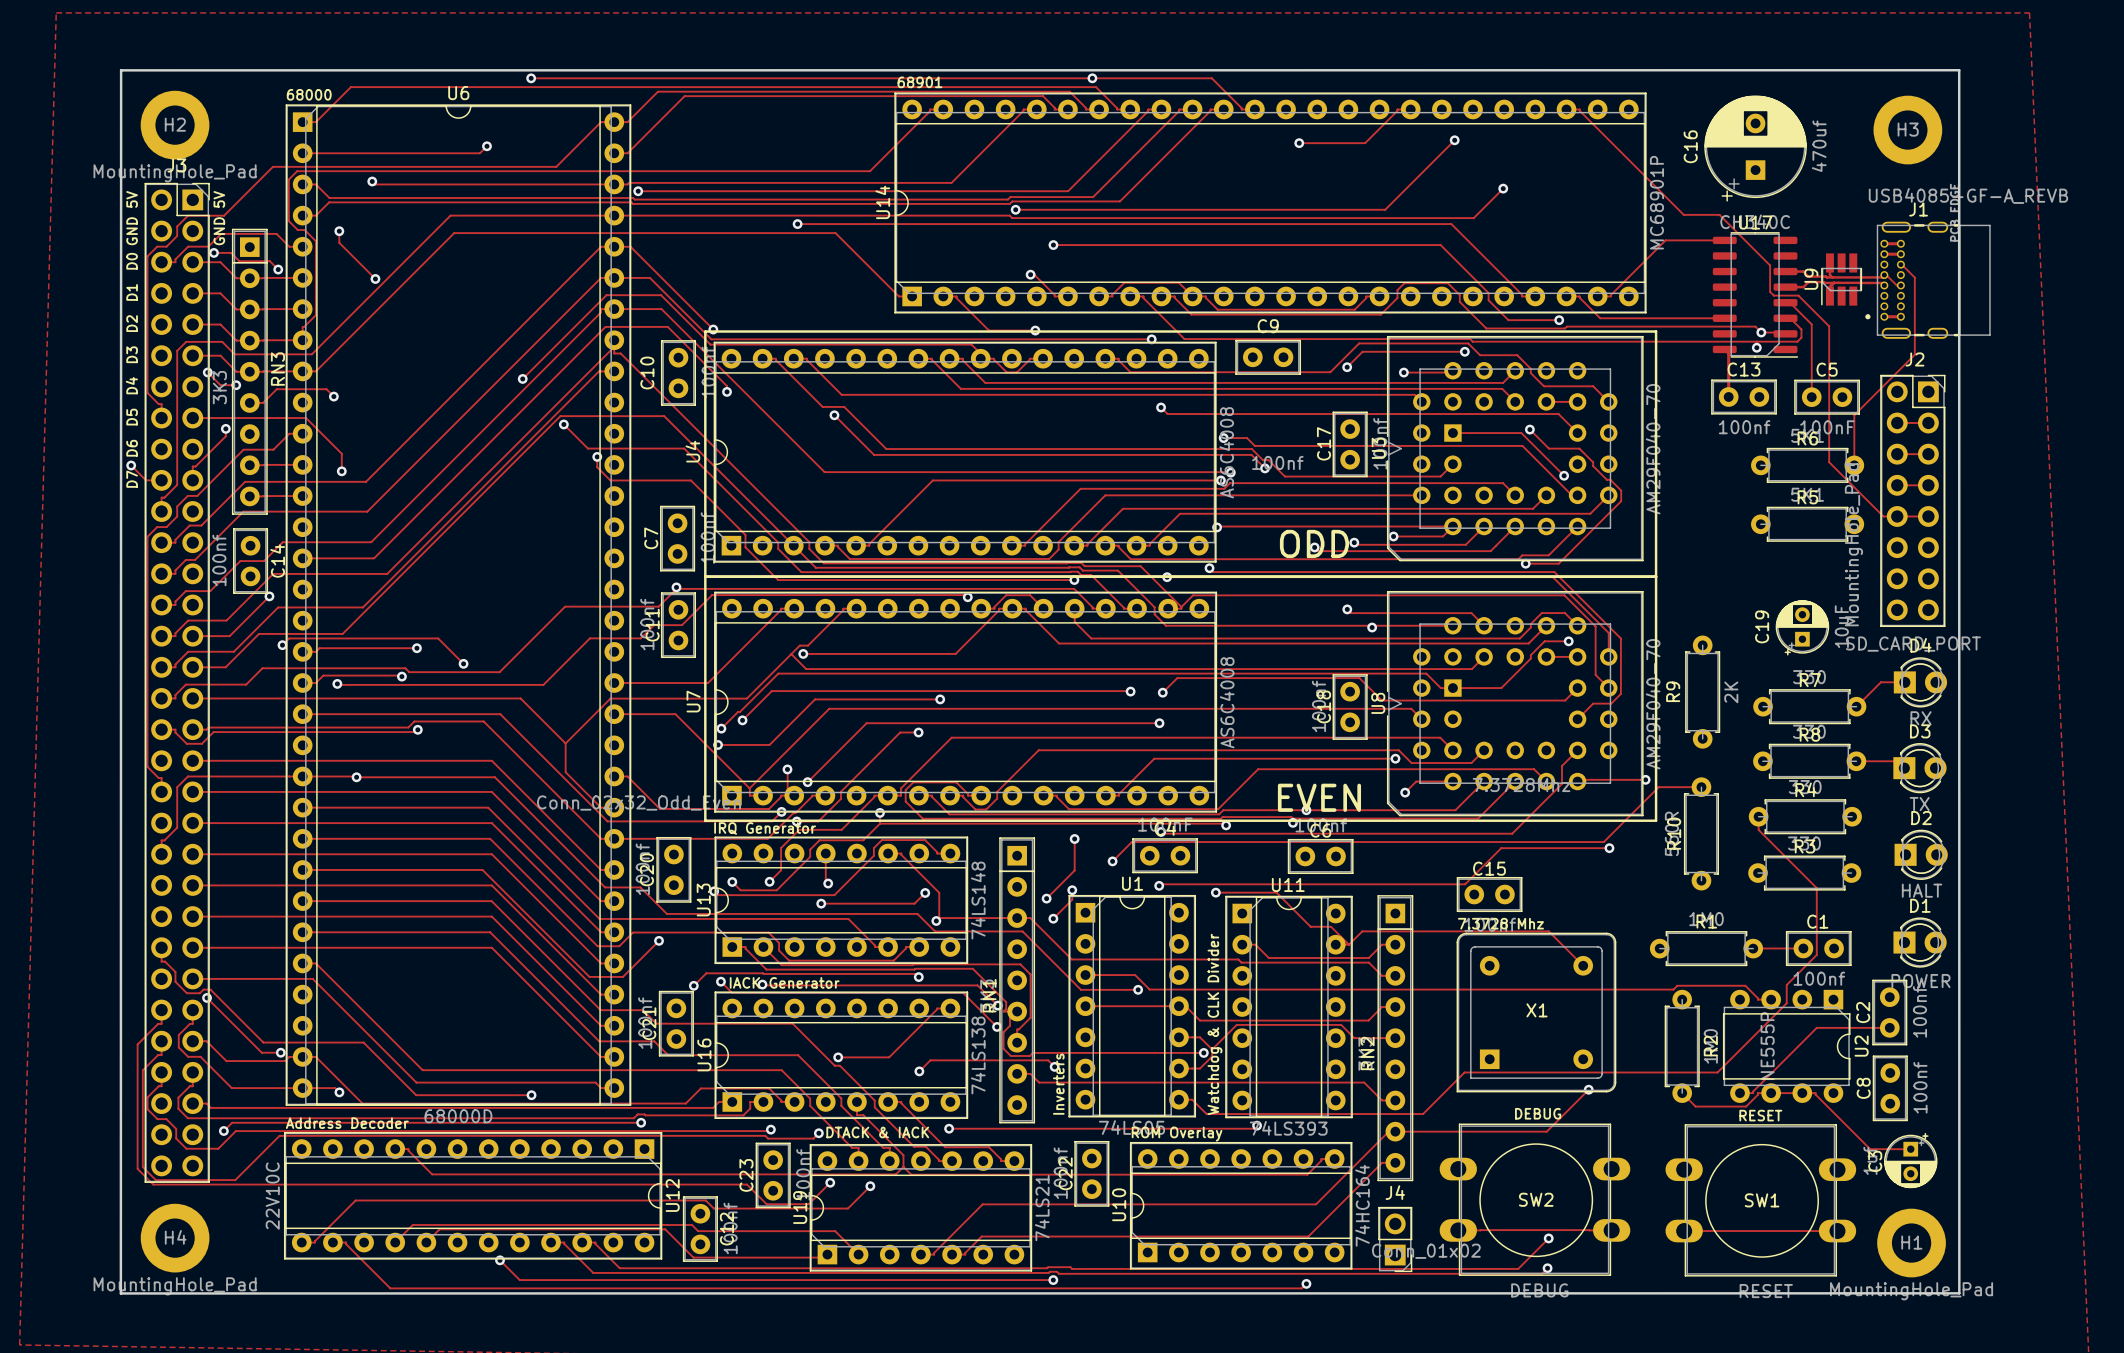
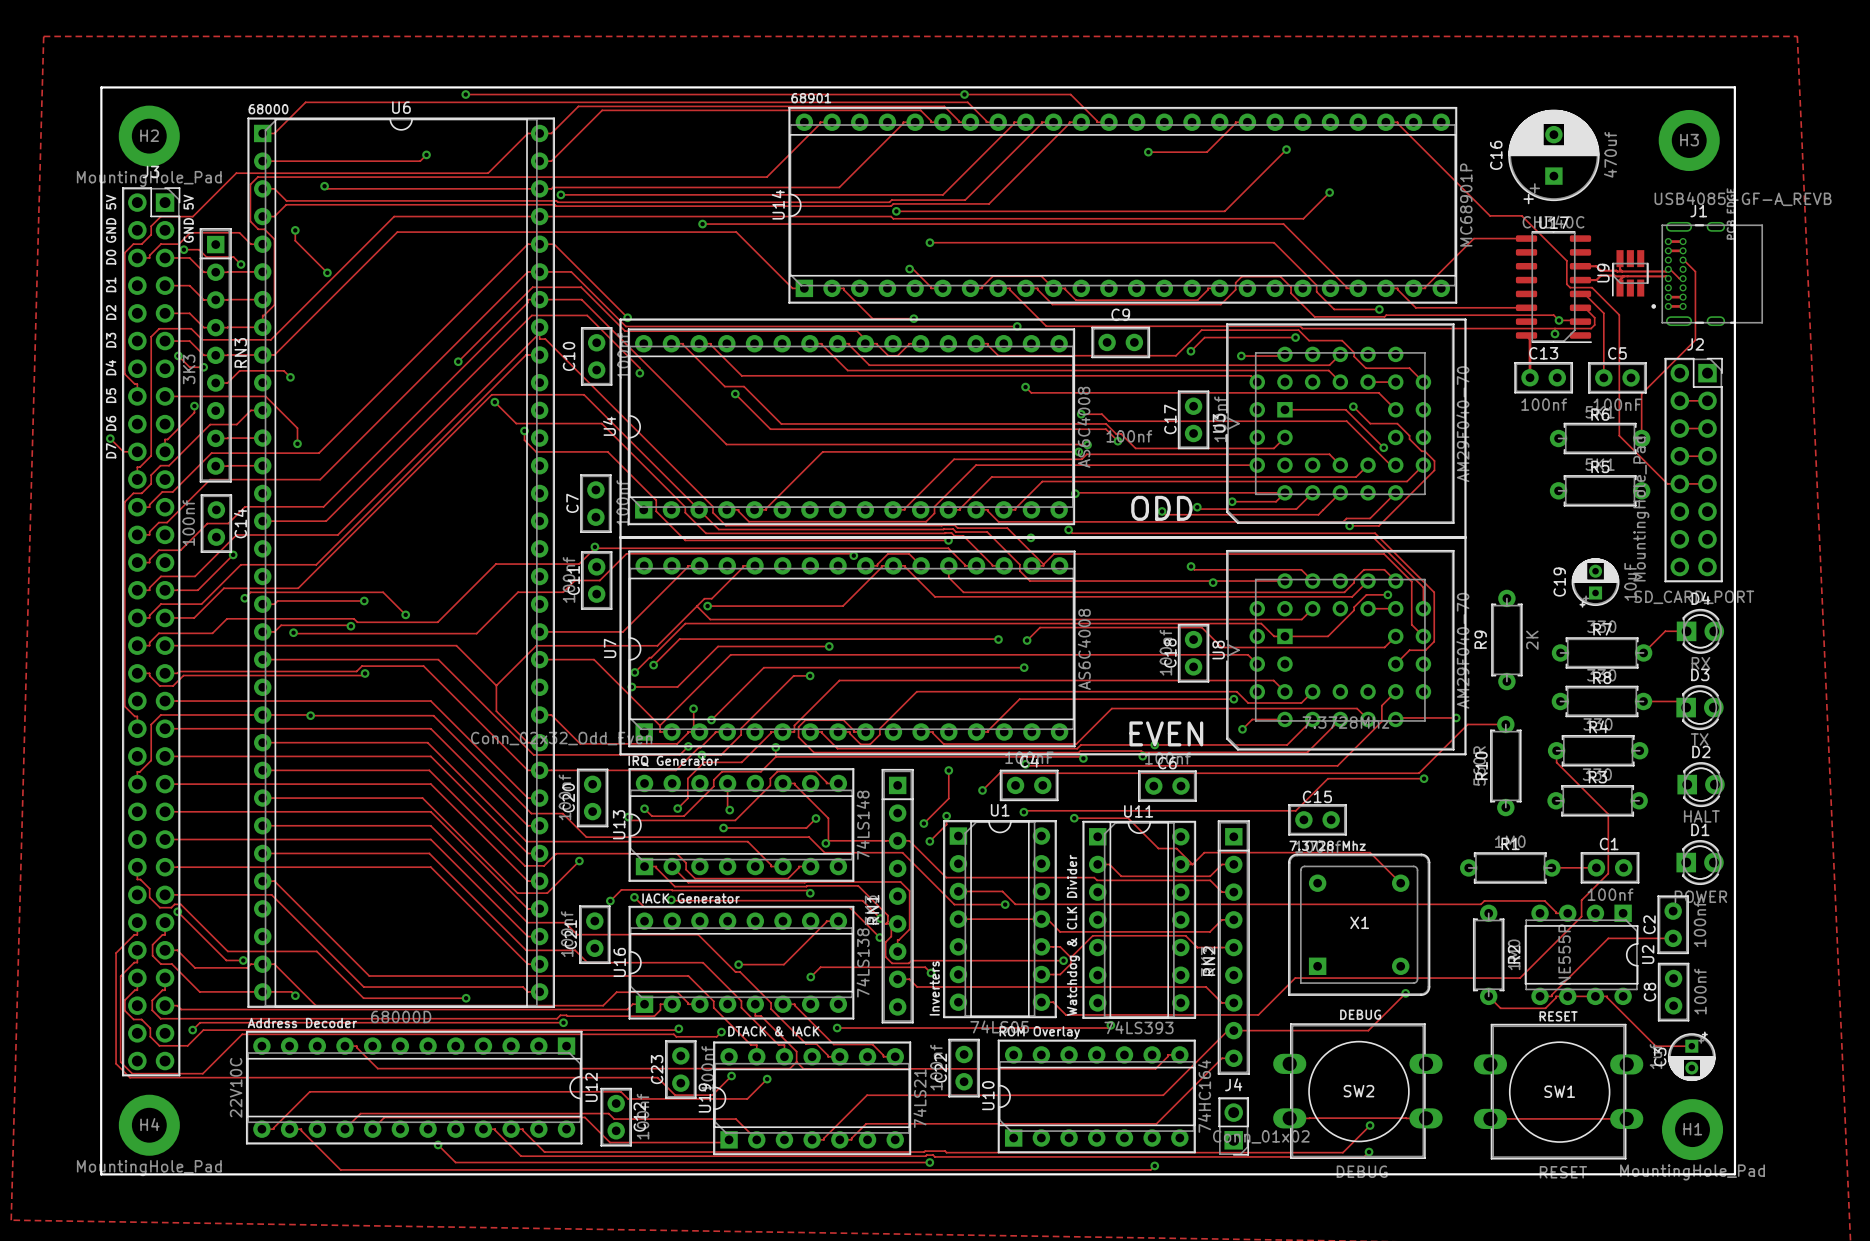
track: none -> (1668, 297) (1683, 297)

